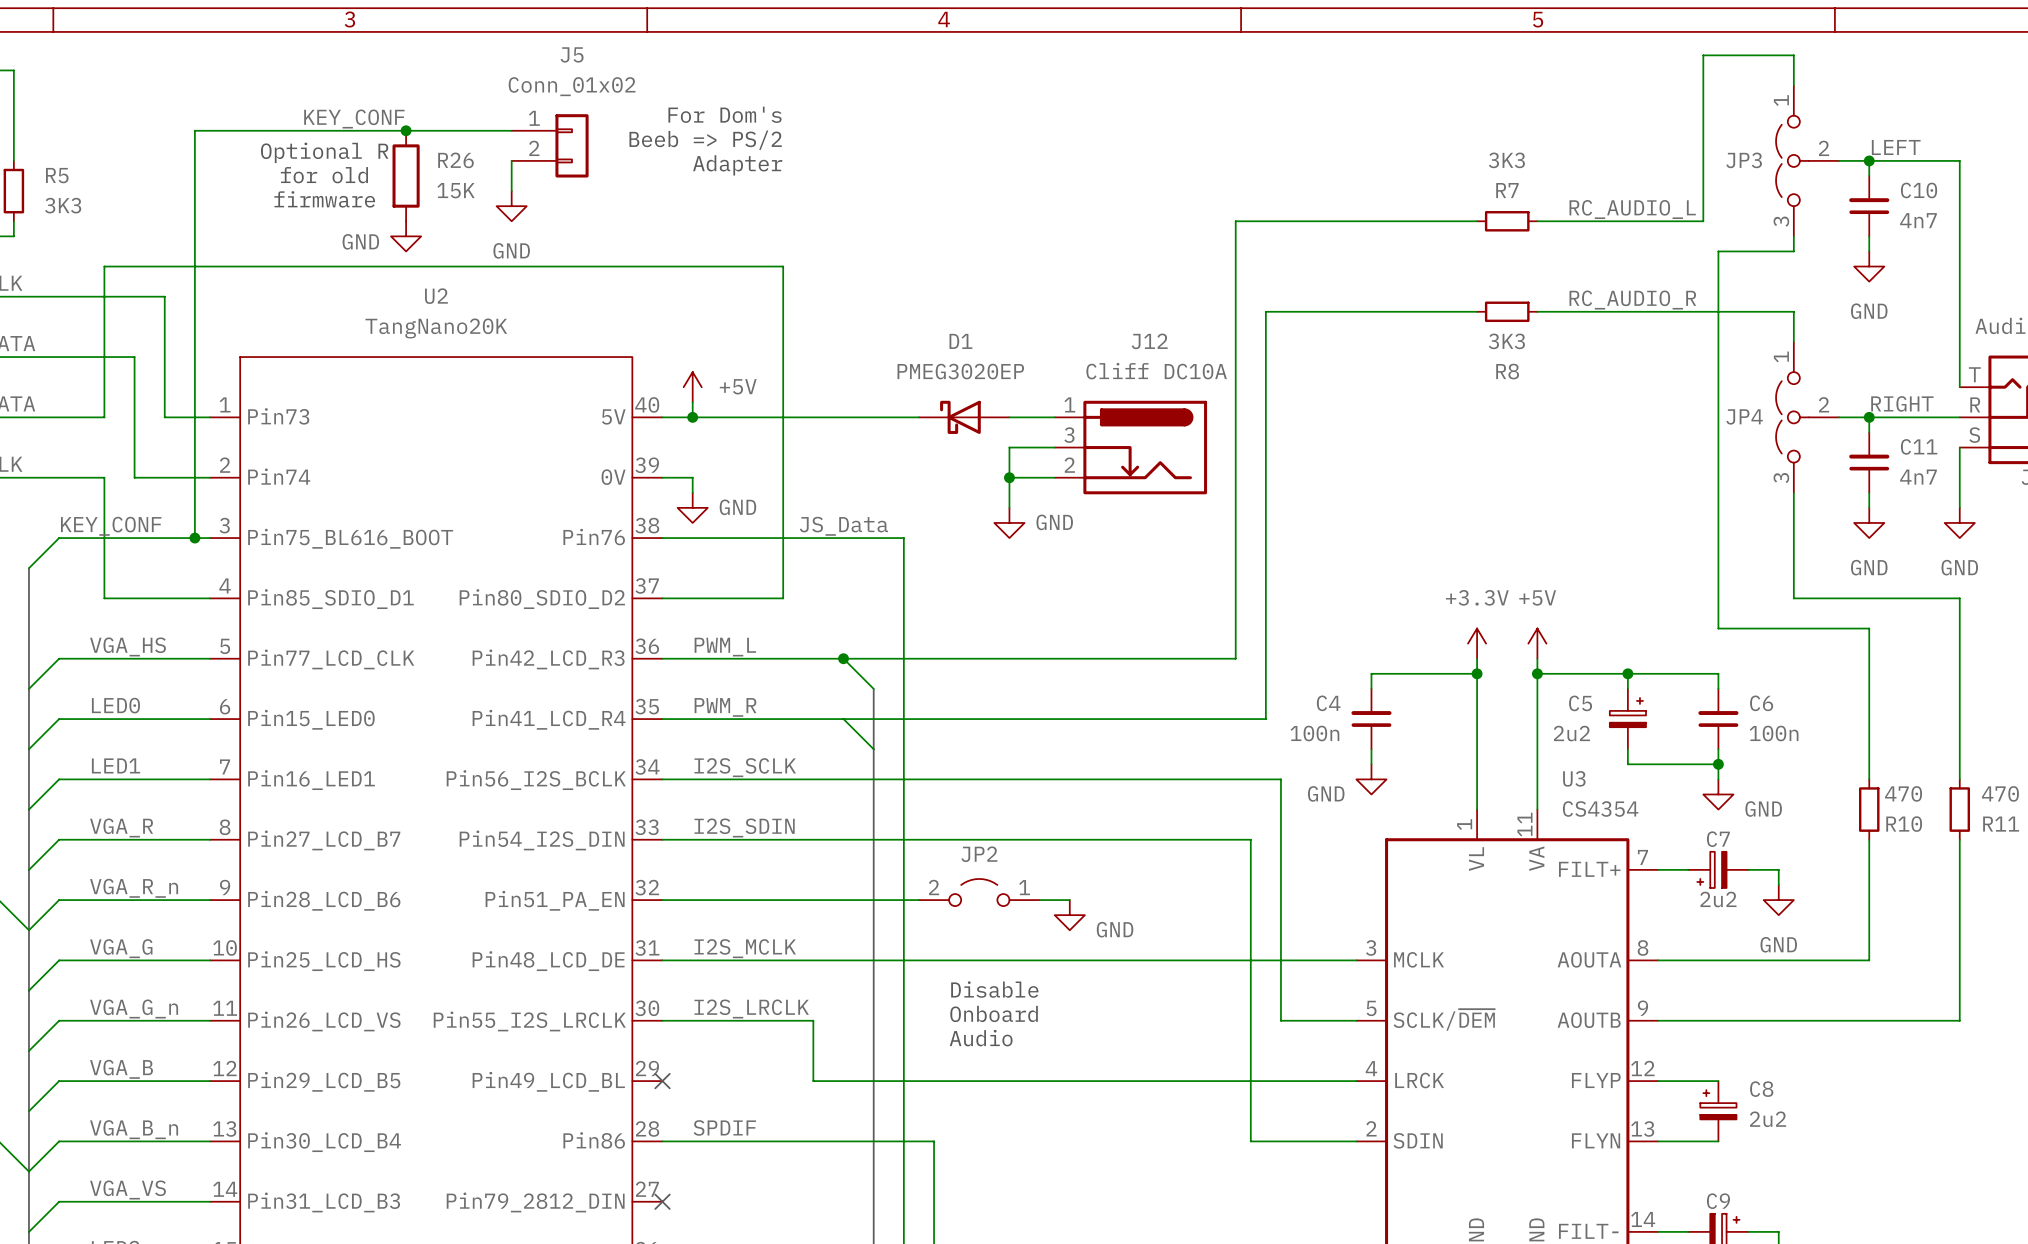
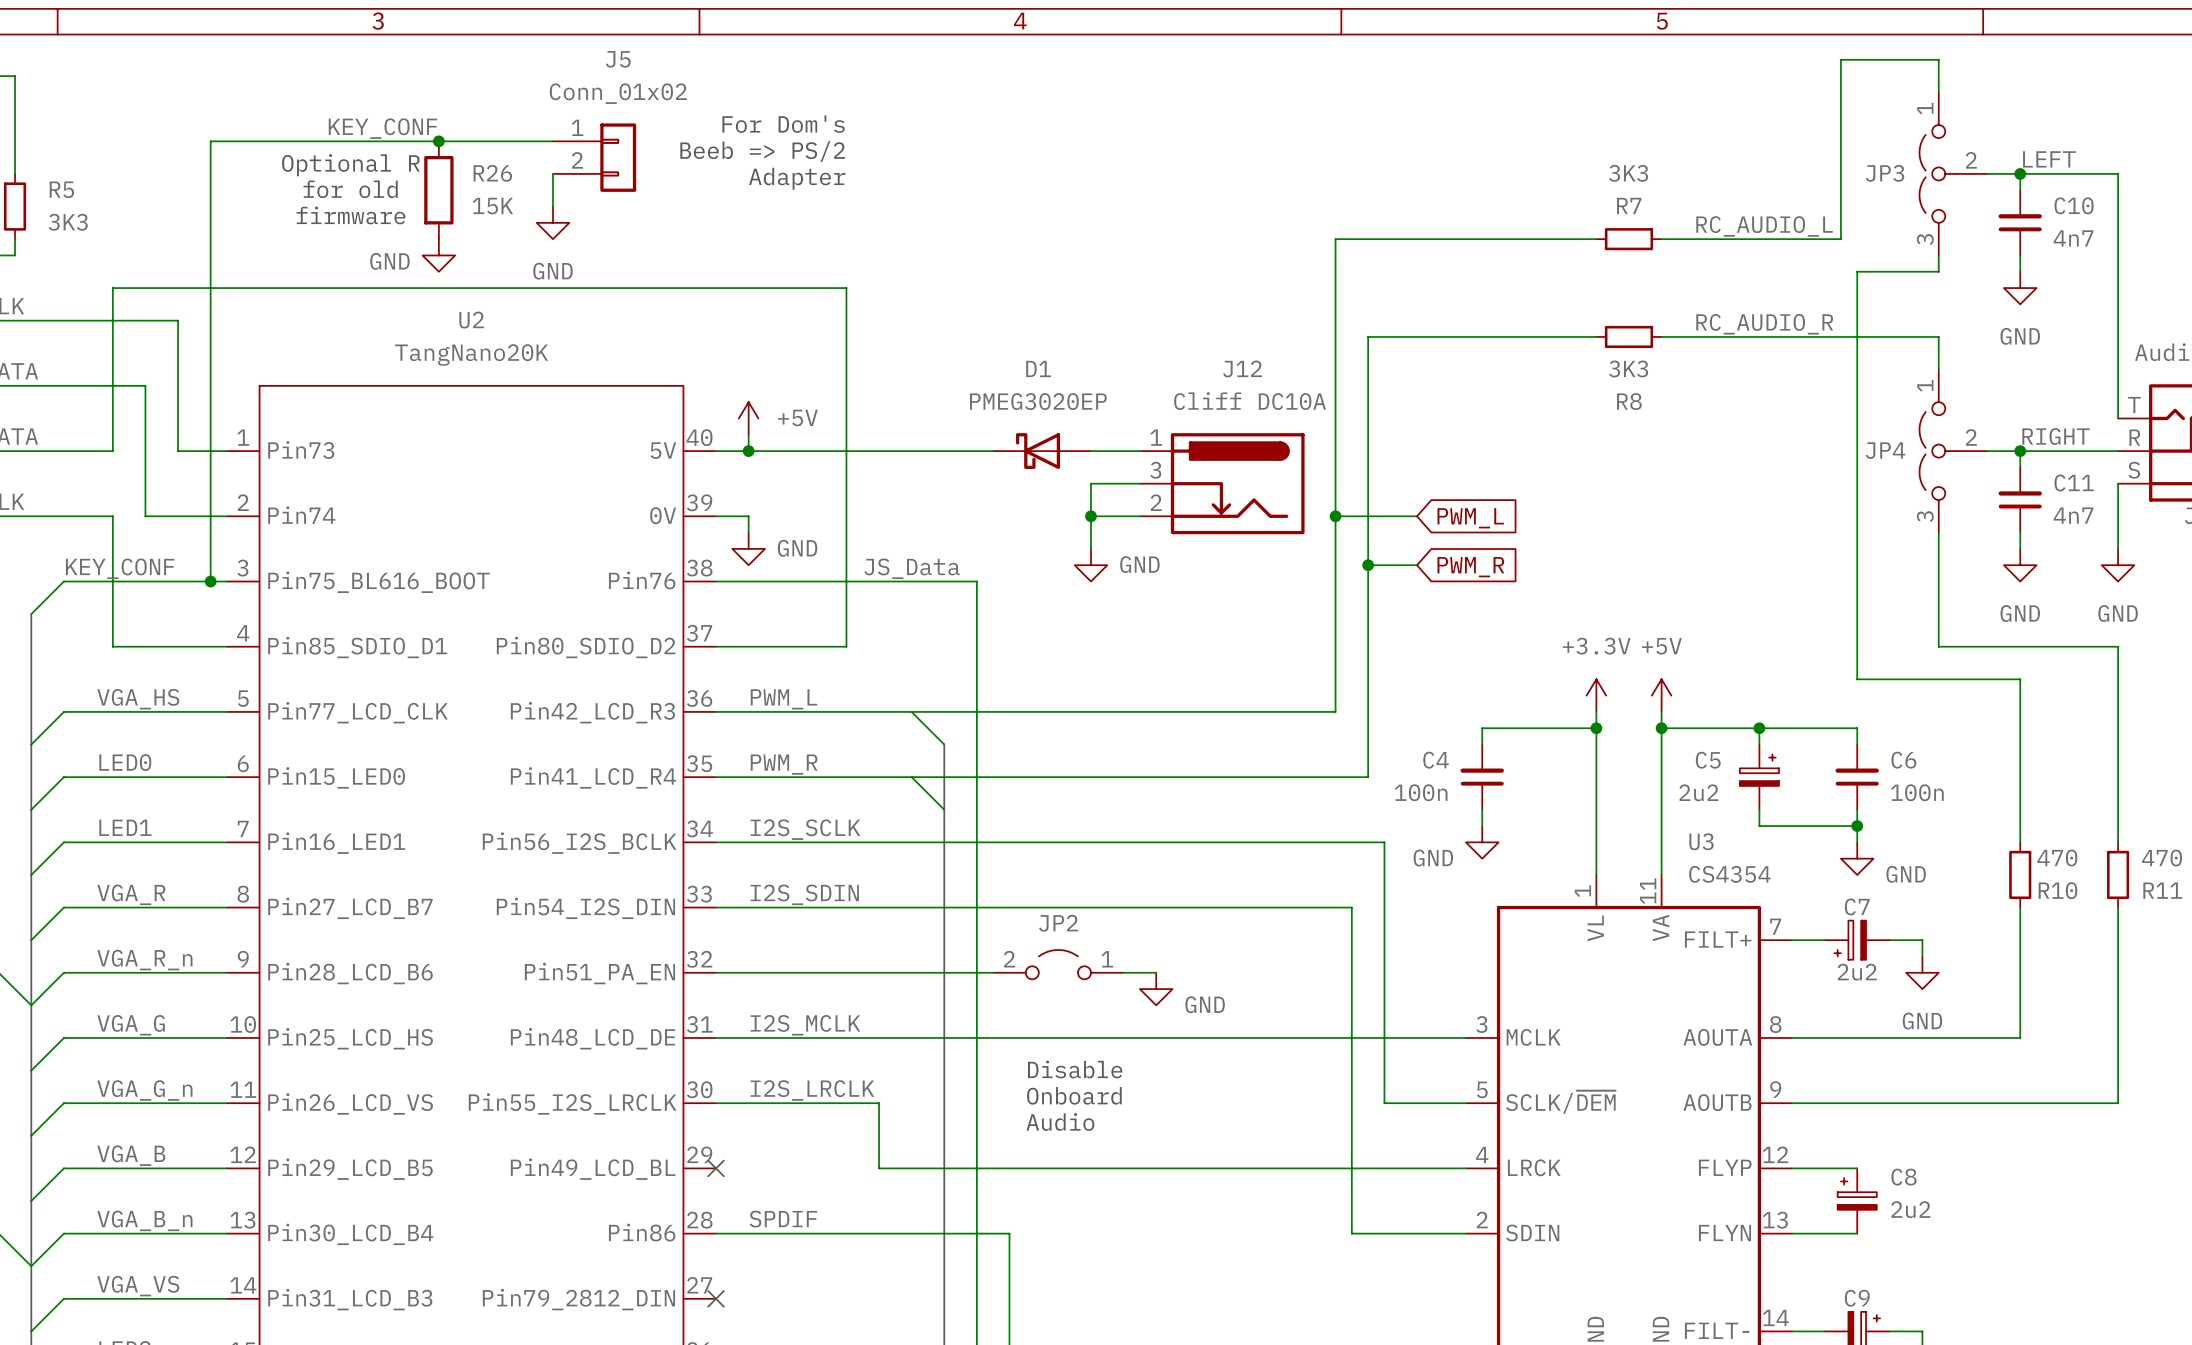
wire: none -> (1335, 516) (1417, 516)
junction: none -> (1335, 516)
global label: none -> PWM_L (1470, 518)
wire: none -> (1368, 565) (1417, 565)
junction: none -> (1368, 565)
global label: none -> PWM_R (1470, 567)
junction: (843, 658) -> none

